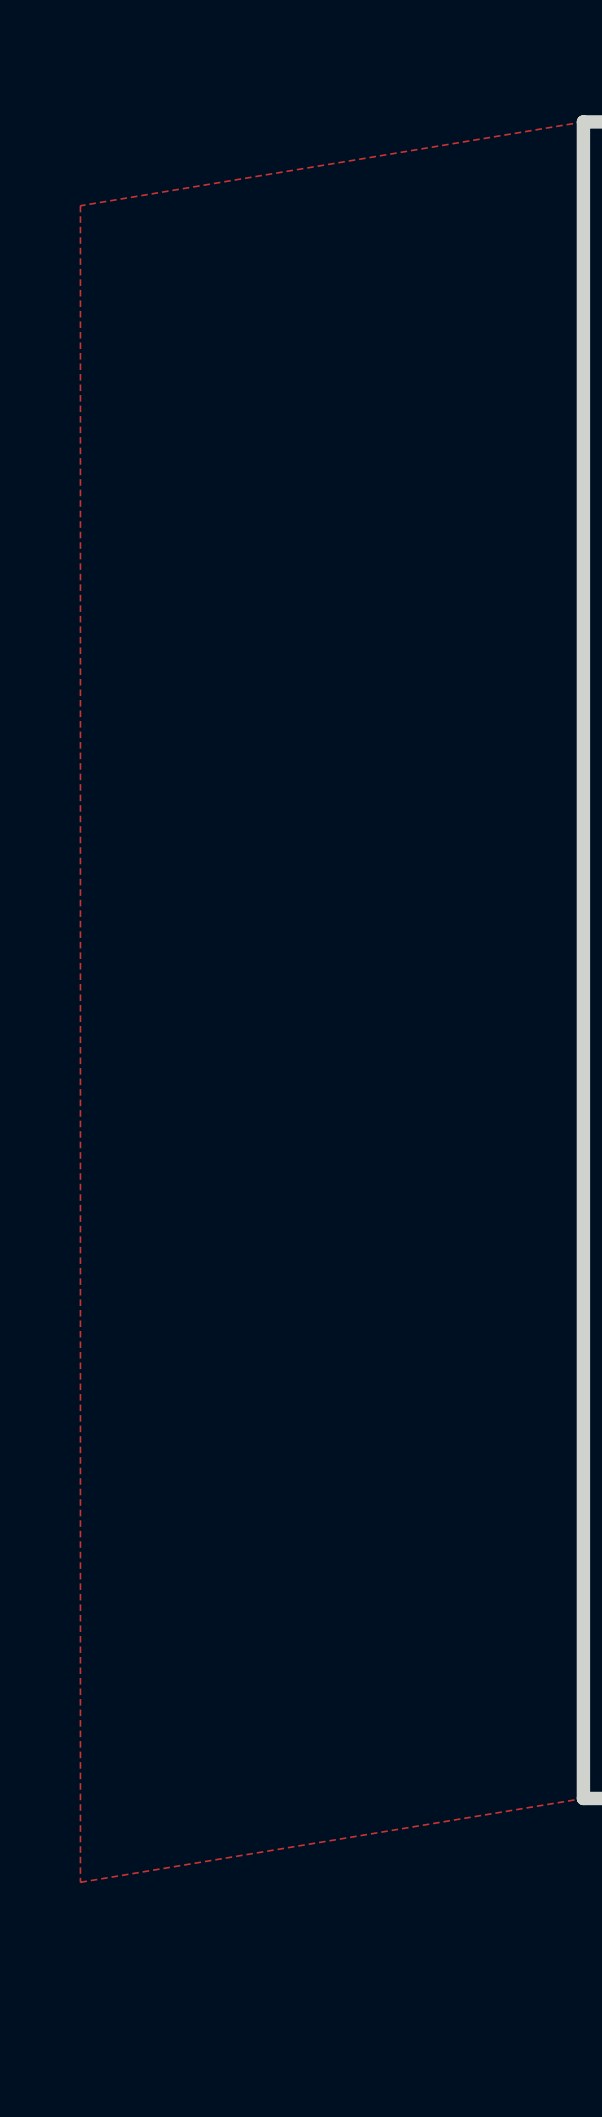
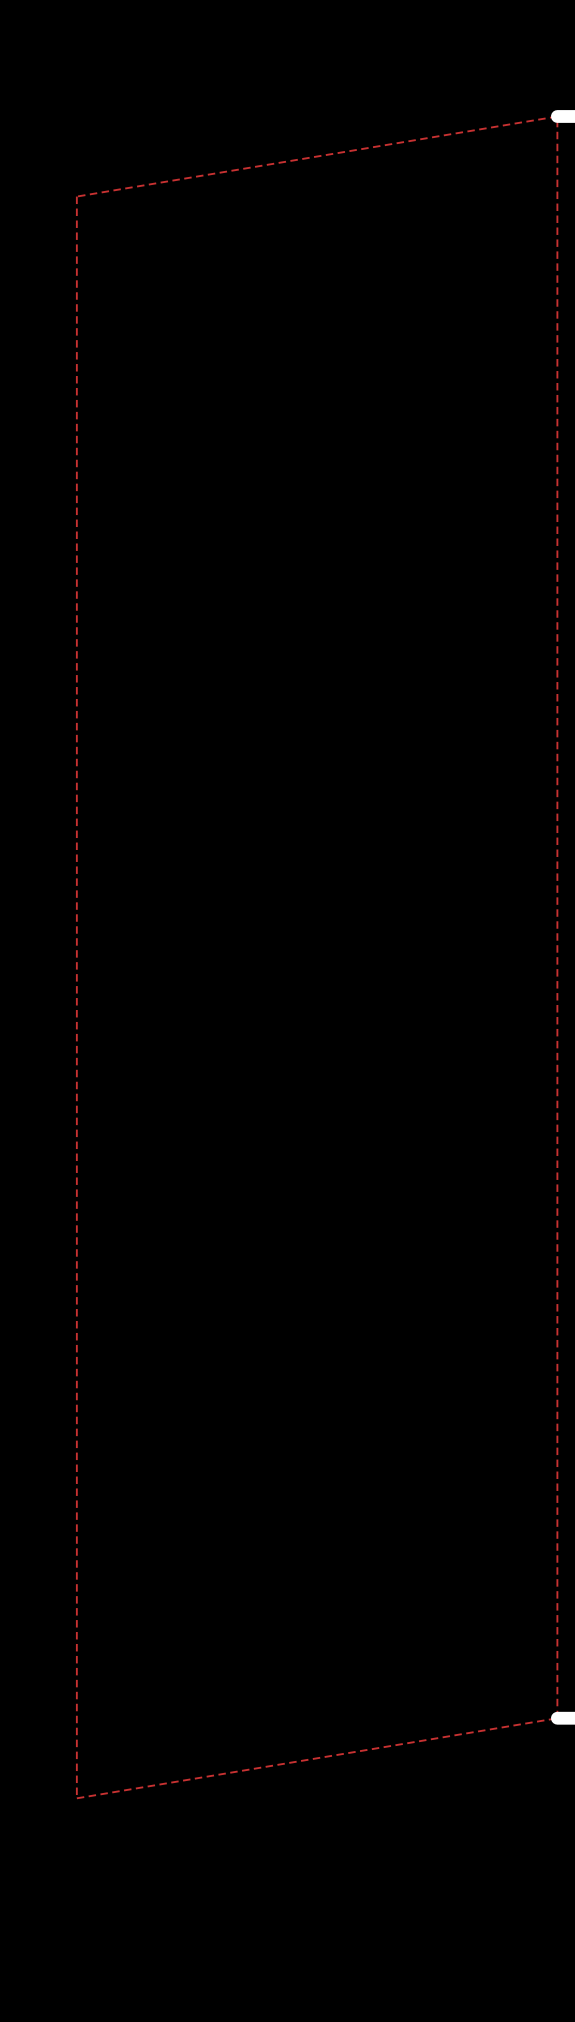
board edge: (583, 121) (583, 1798) -> none

